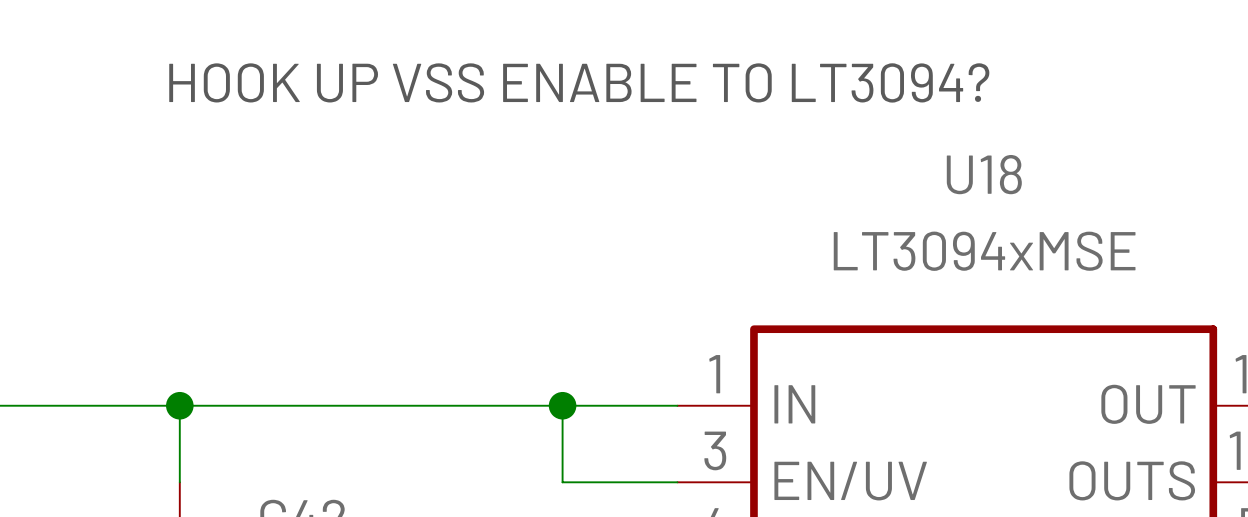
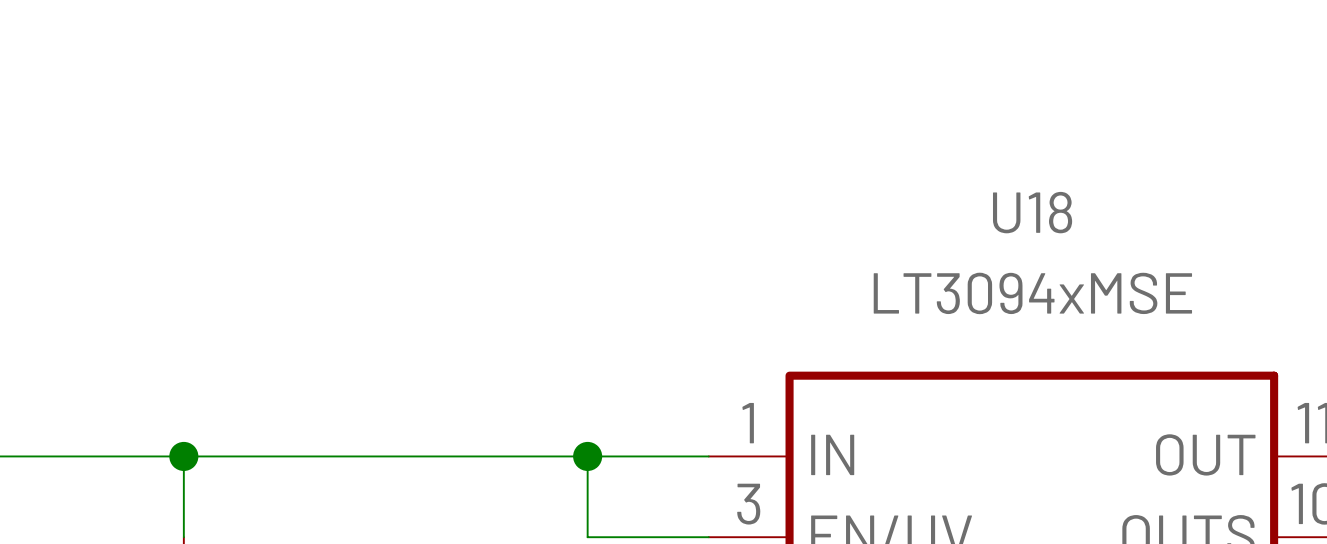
text: HOOK UP VSS ENABLE TO LT3094? (579, 82) -> none

